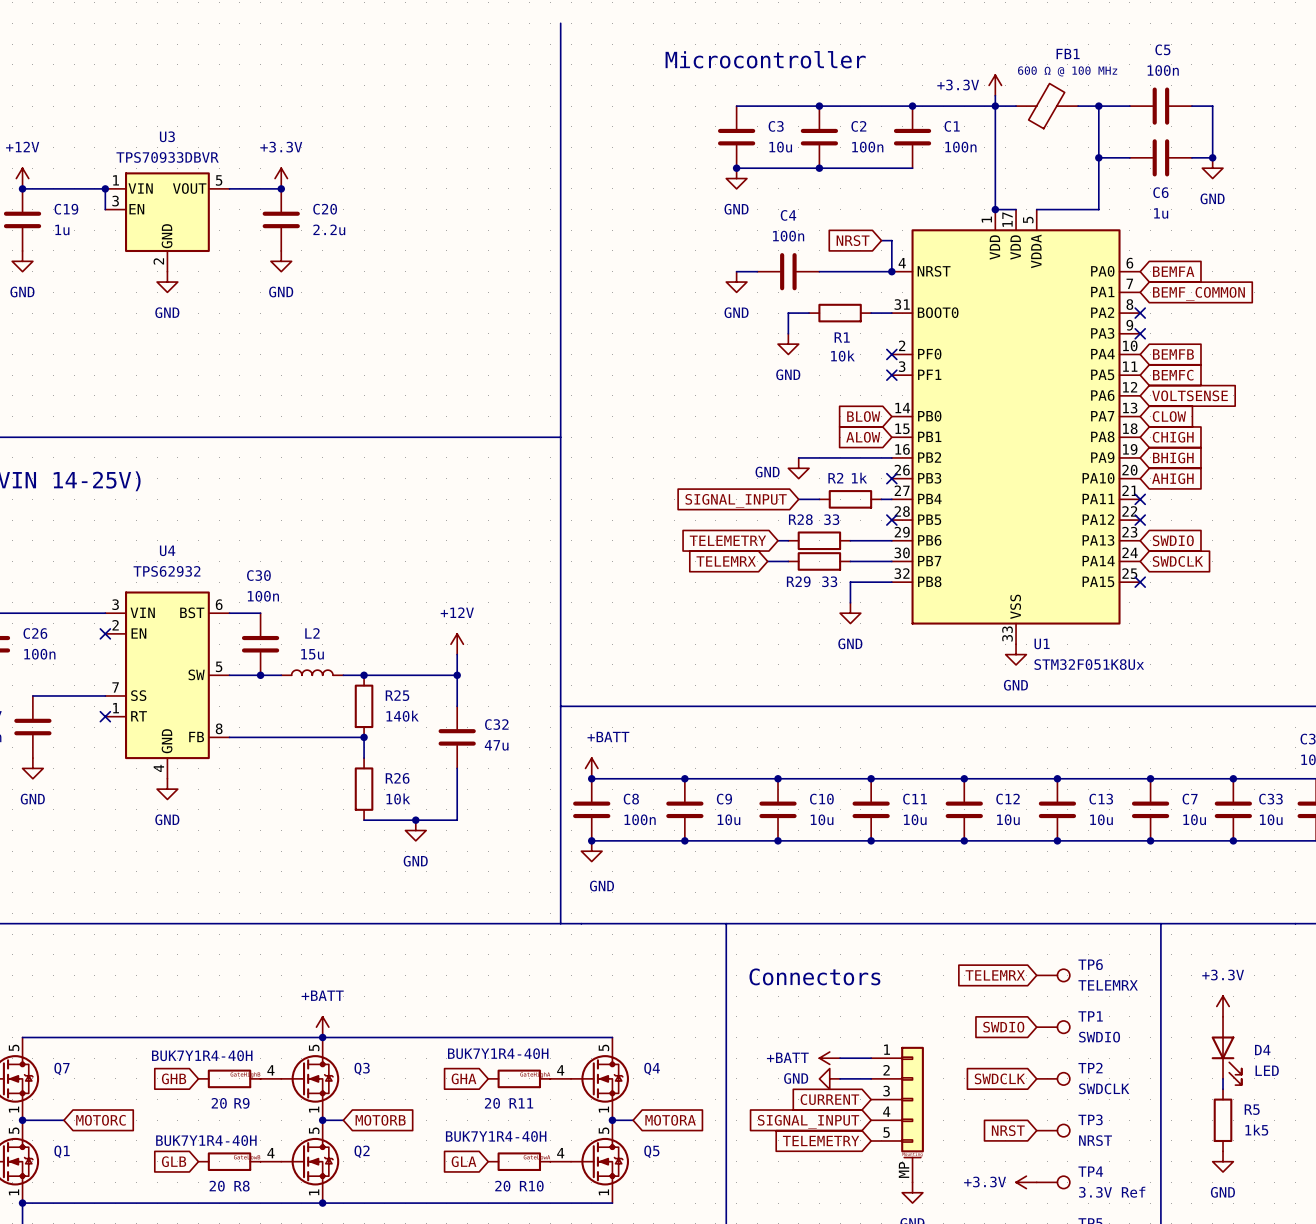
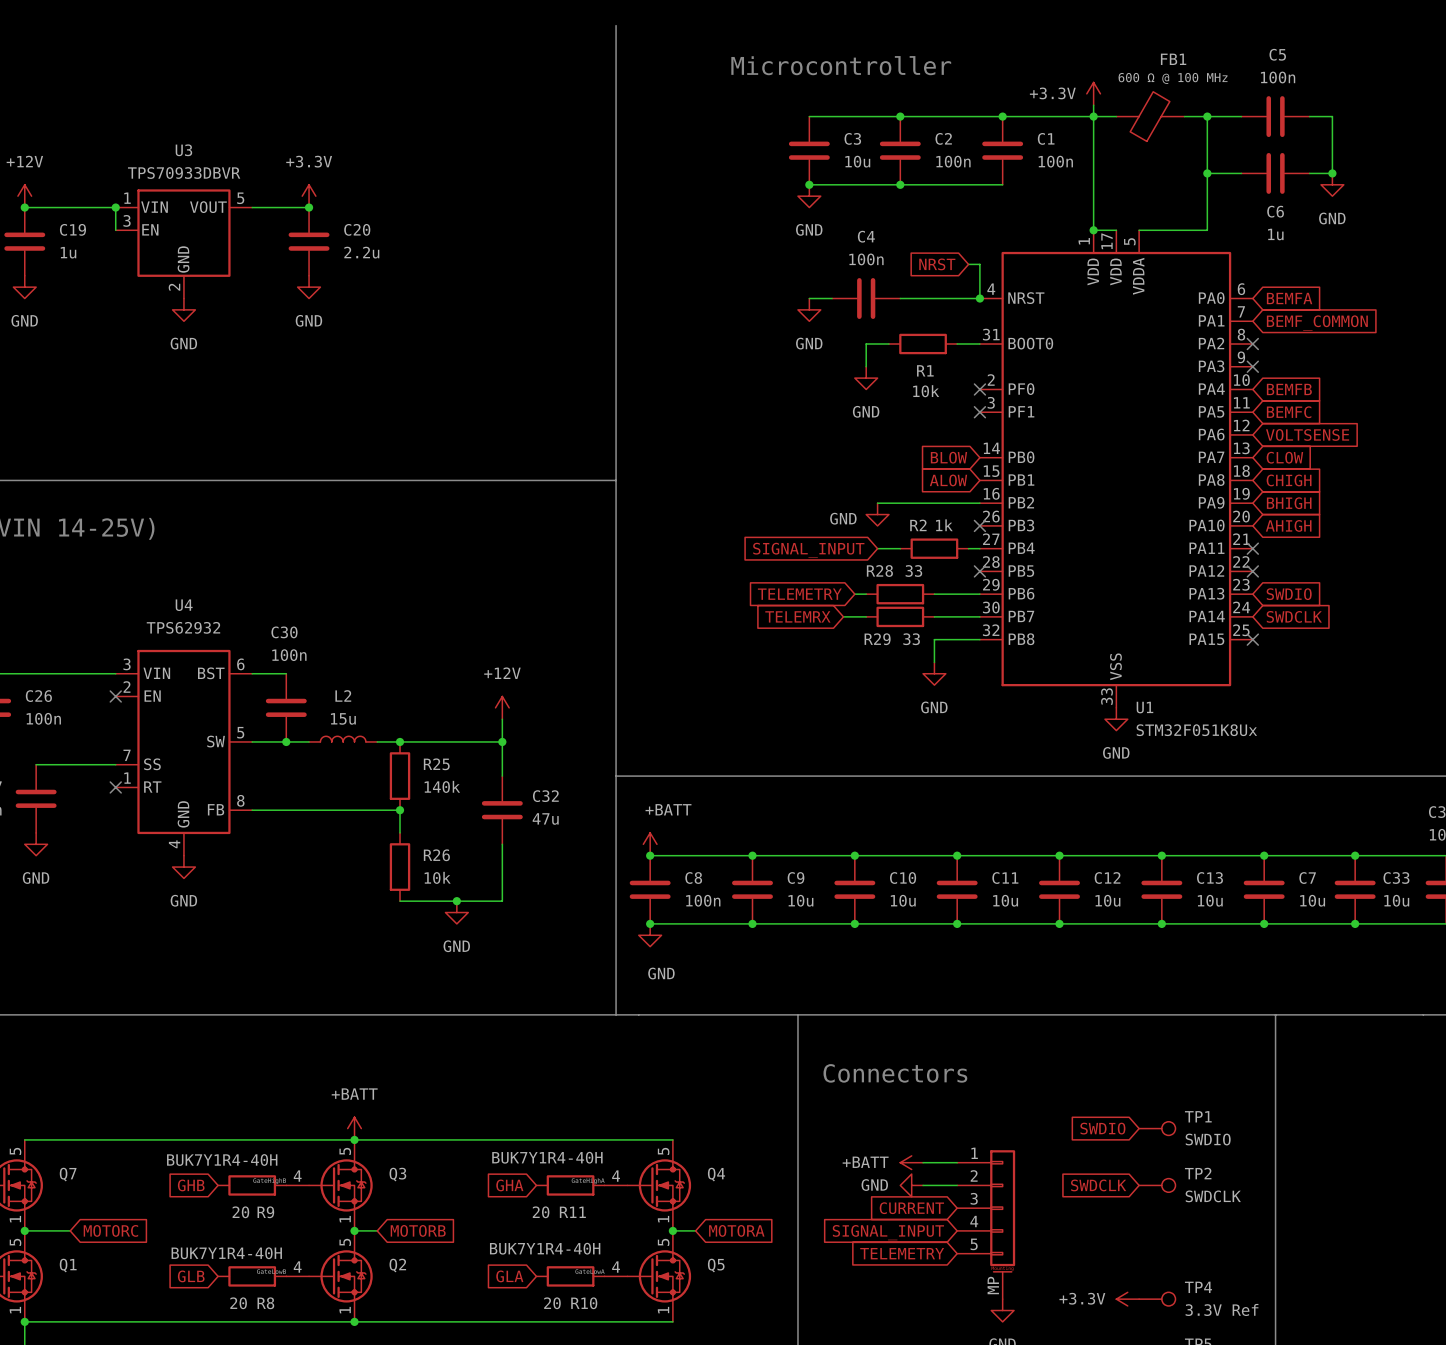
global label: TELEMRX (995, 975) -> none
TP6: TELEMRX (1053, 975) -> none
power symbol: +3.3V (1223, 1006) -> none
D4: LED (1226, 1050) -> none
wire: (1223, 1078) (1223, 1089) -> none
R5: 1k5 (1223, 1120) -> none
global label: NRST (1008, 1130) -> none
TP3: NRST (1053, 1130) -> none
power symbol: GND (1223, 1161) -> none

